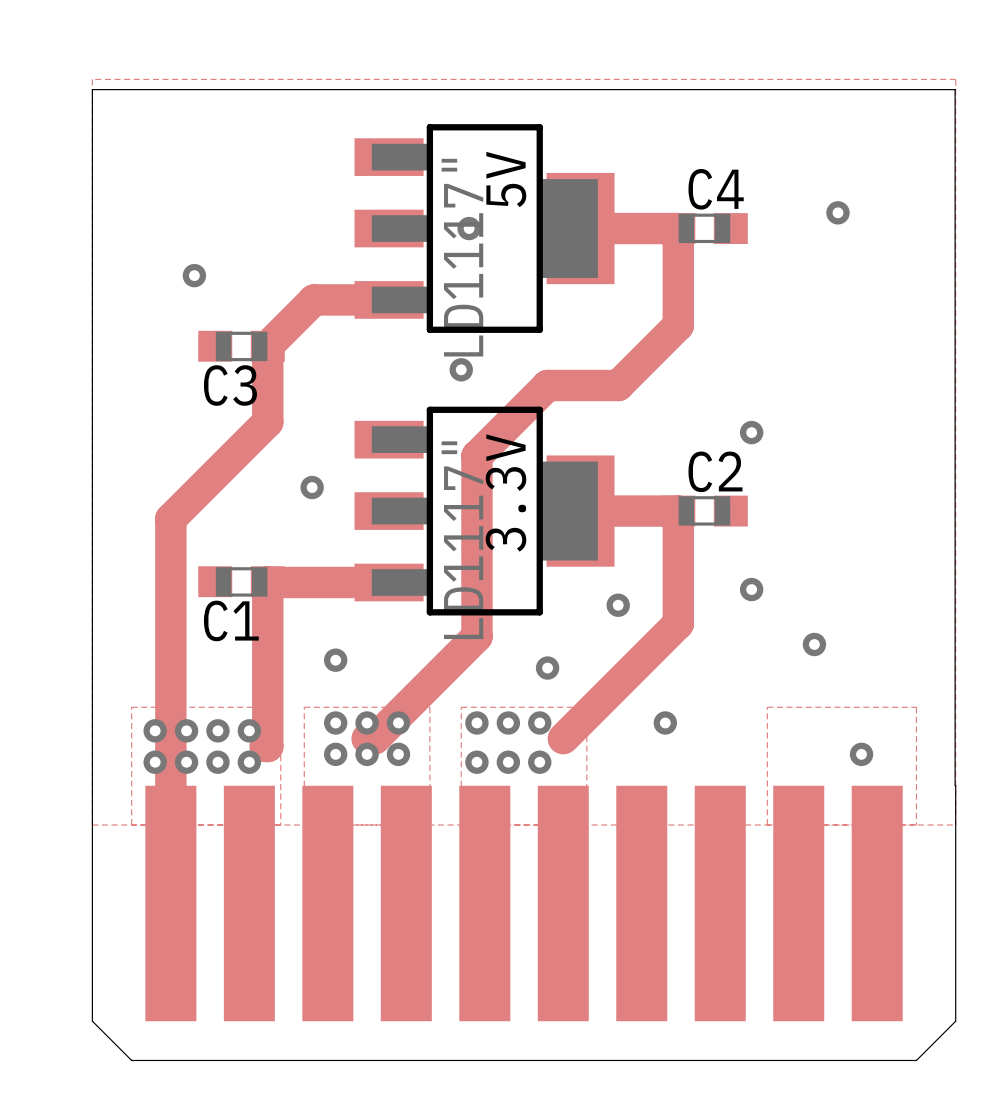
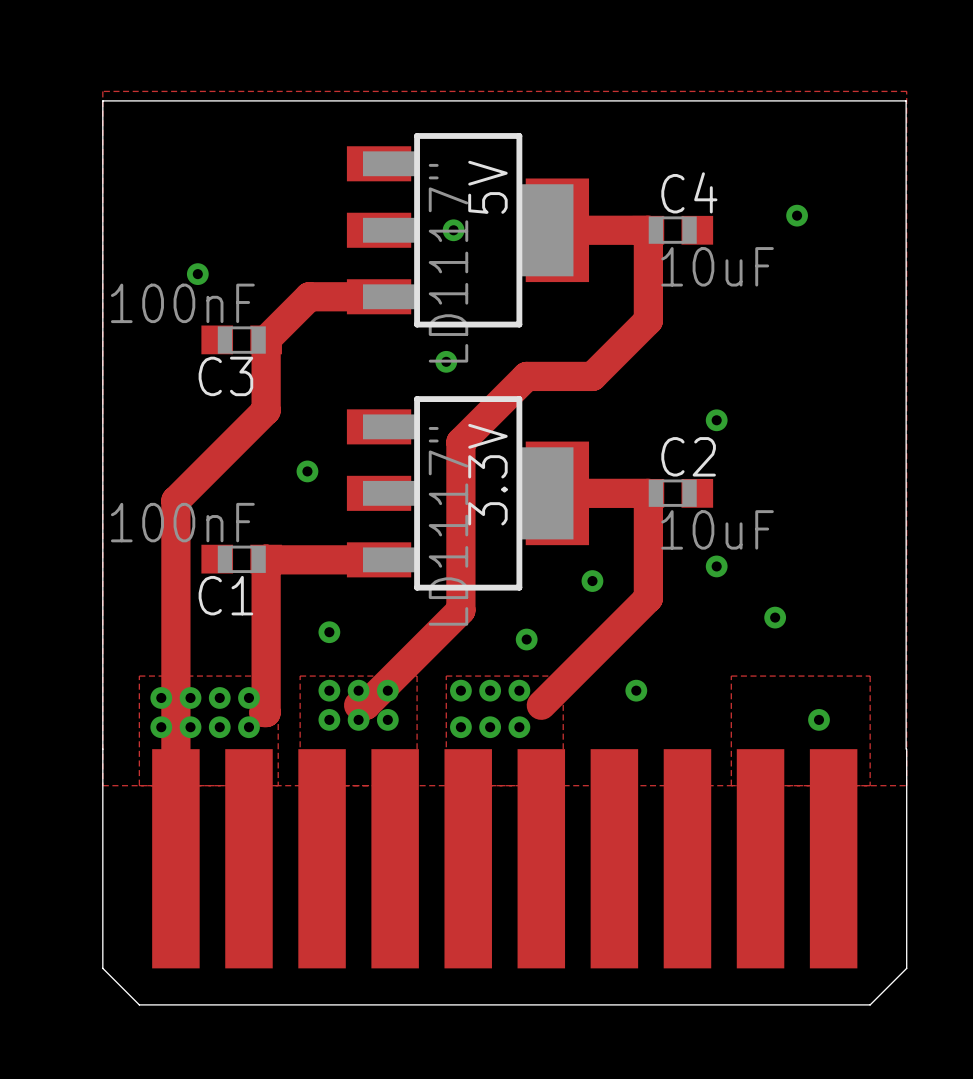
C4 value: none -> 10uF (717, 266)
C3 value: none -> 100nF (182, 303)
C1 value: none -> 100nF (182, 522)
C2 value: none -> 10uF (717, 529)

